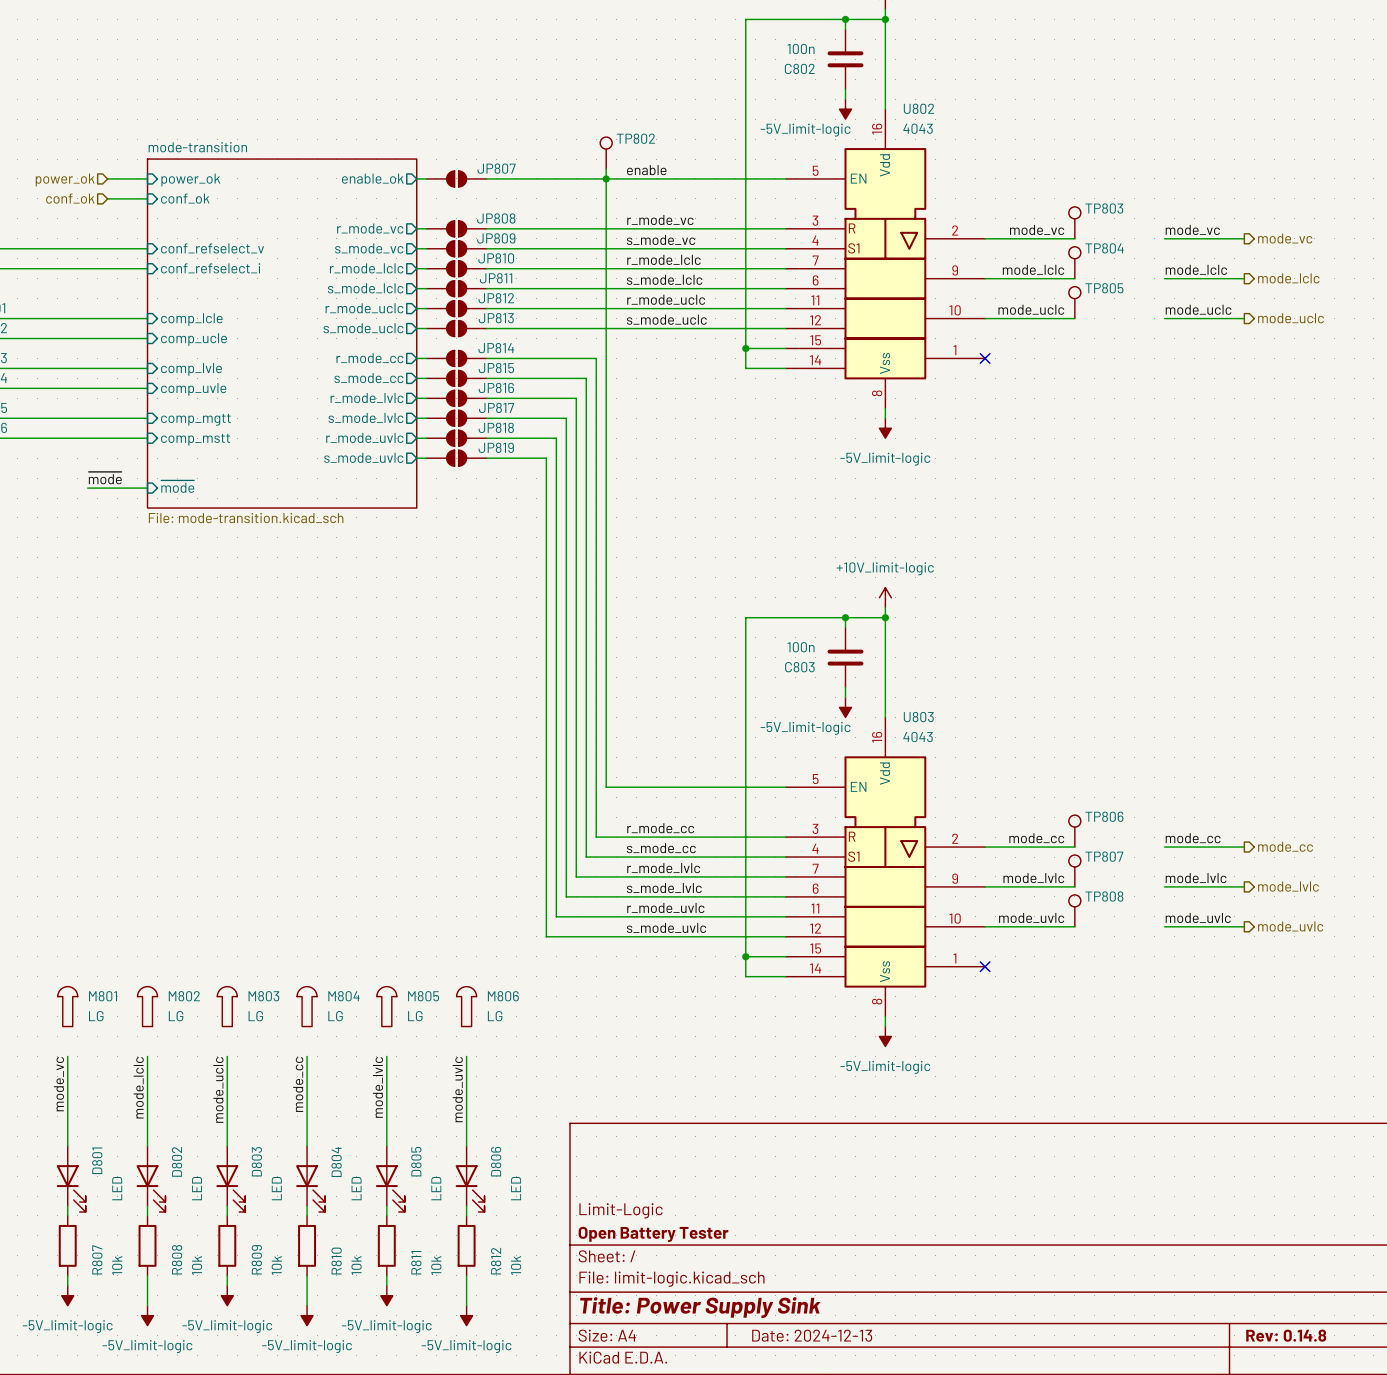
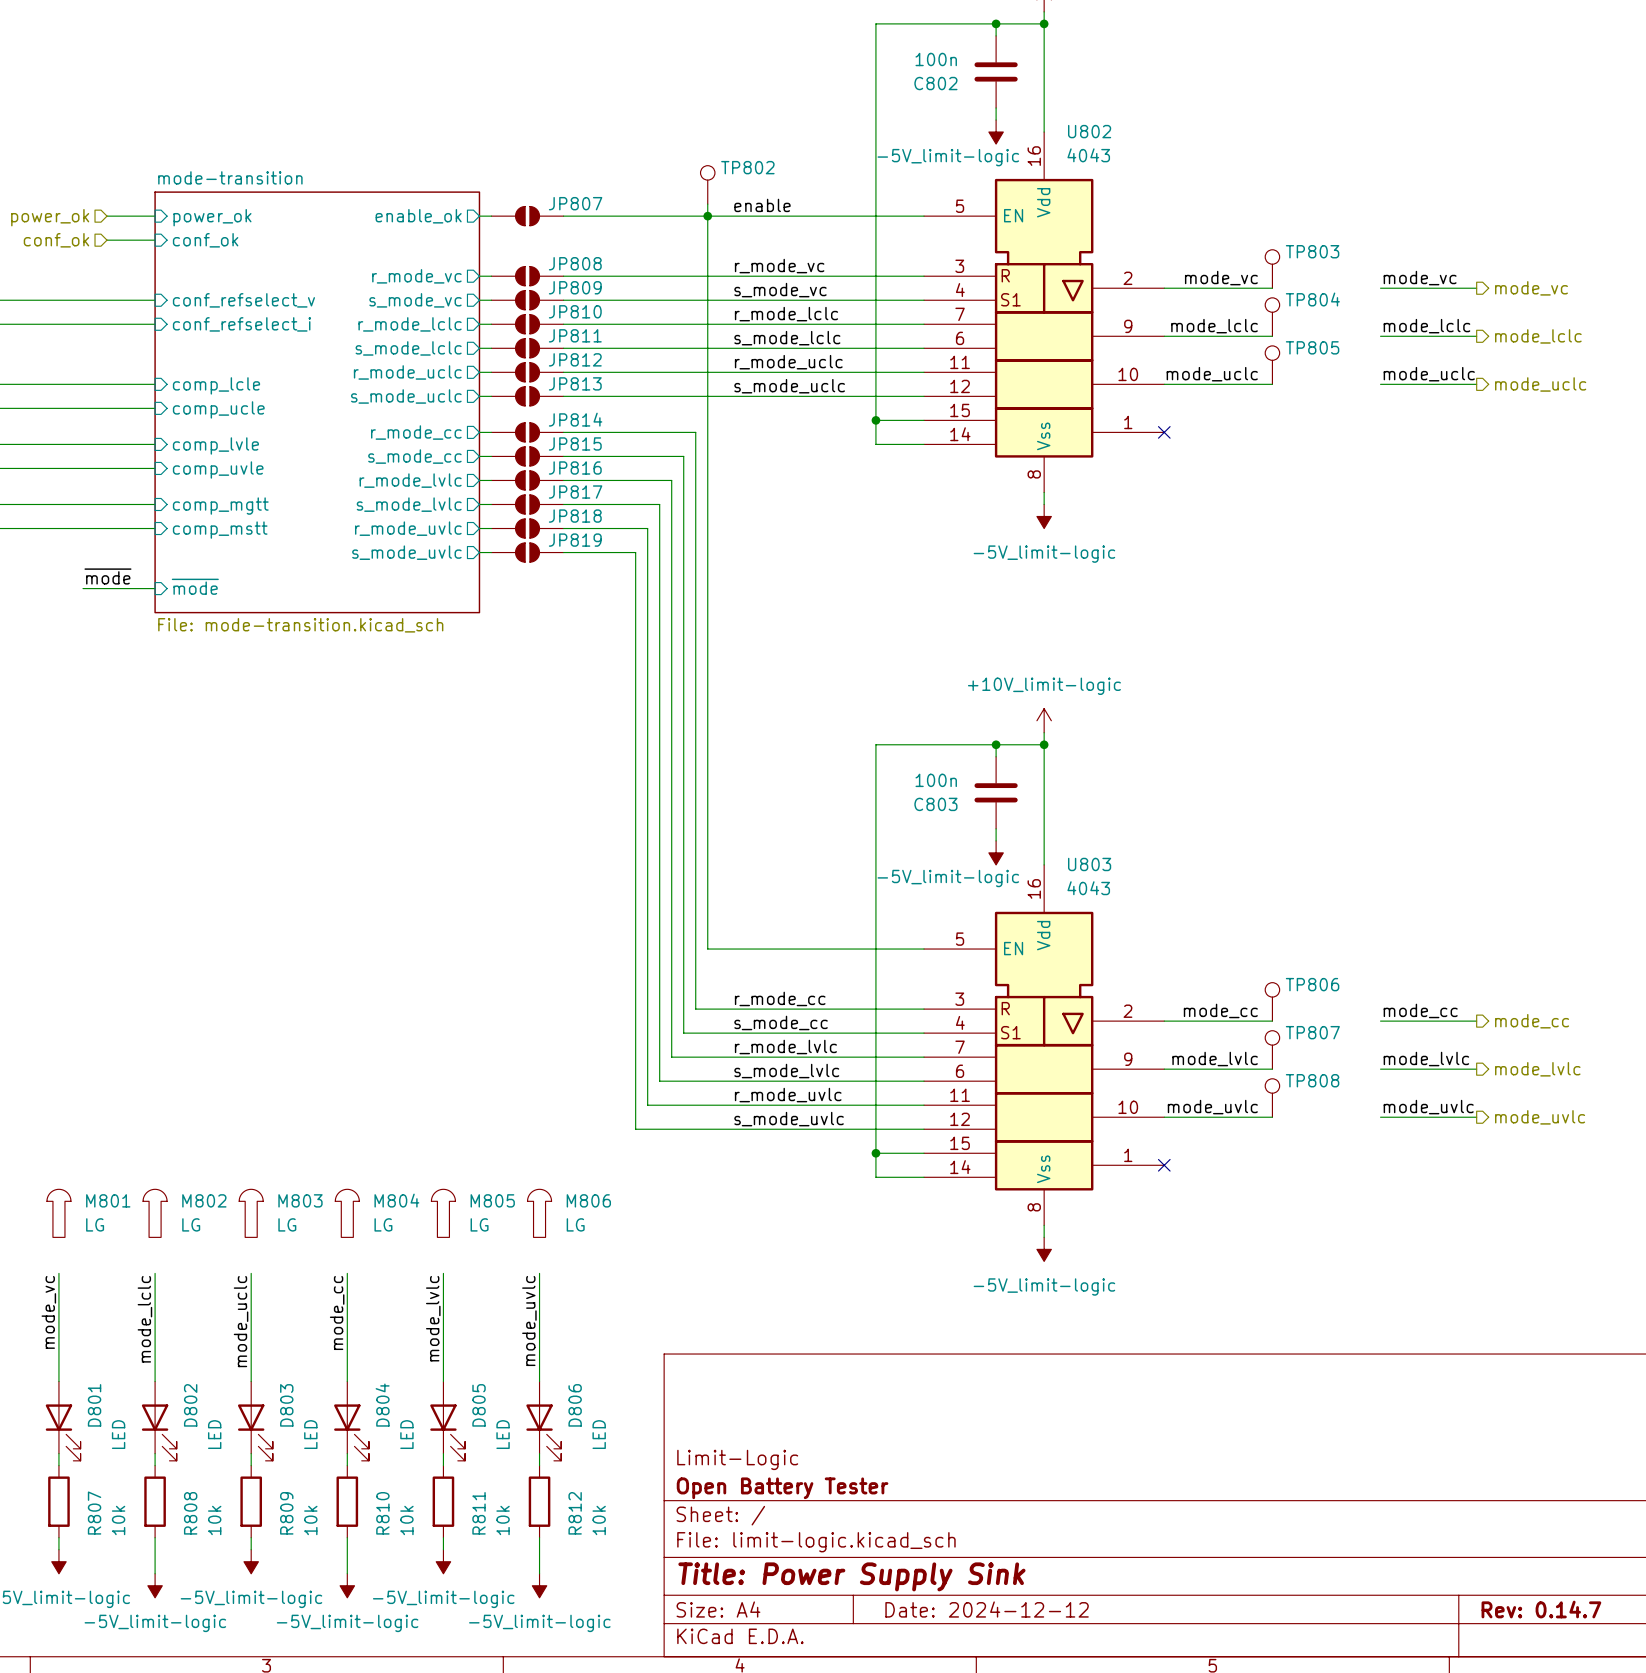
title block: Date: 2024-12-13 (812, 1335) -> Date: 2024-12-12 (987, 1609)
title block: Rev: 0.14.8 (1286, 1335) -> Rev: 0.14.7 (1541, 1609)

